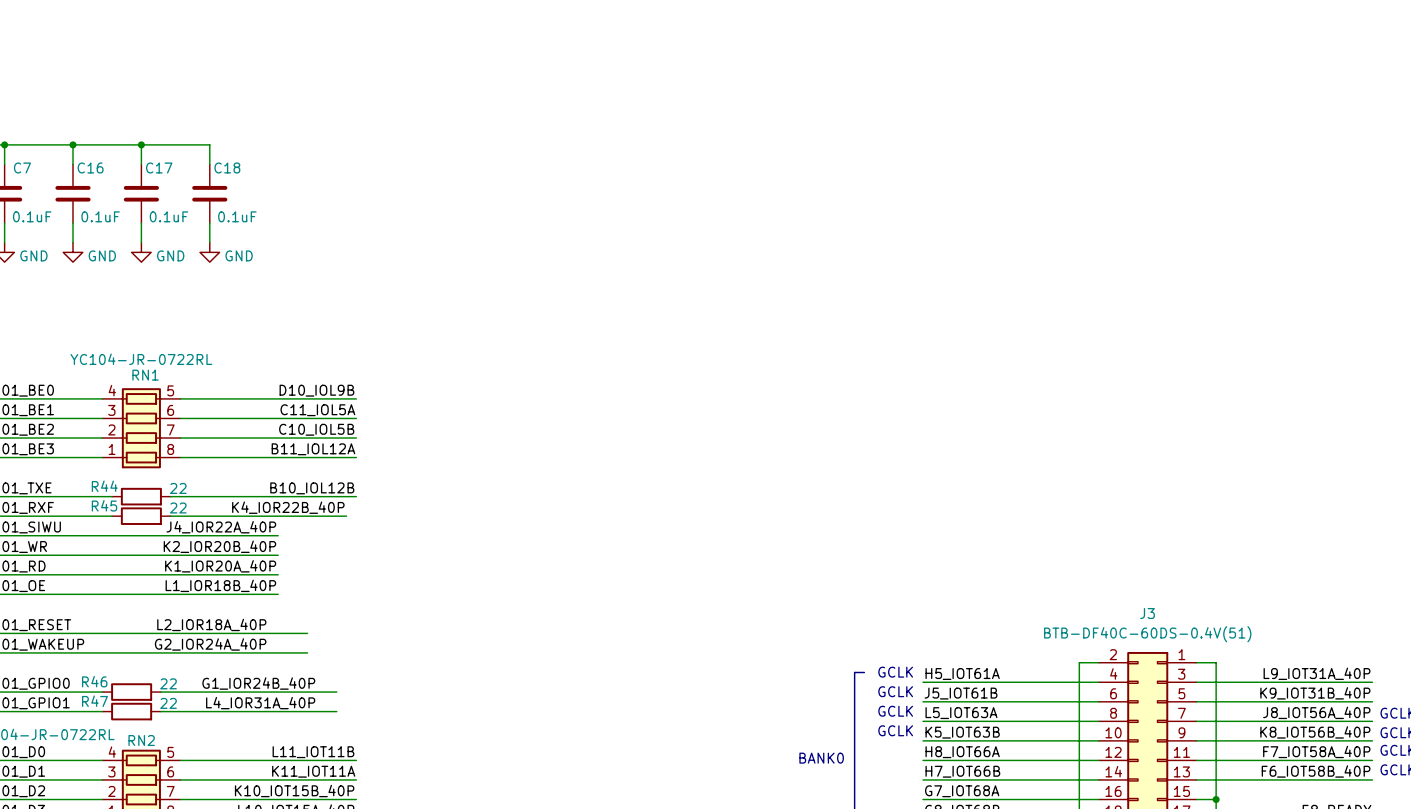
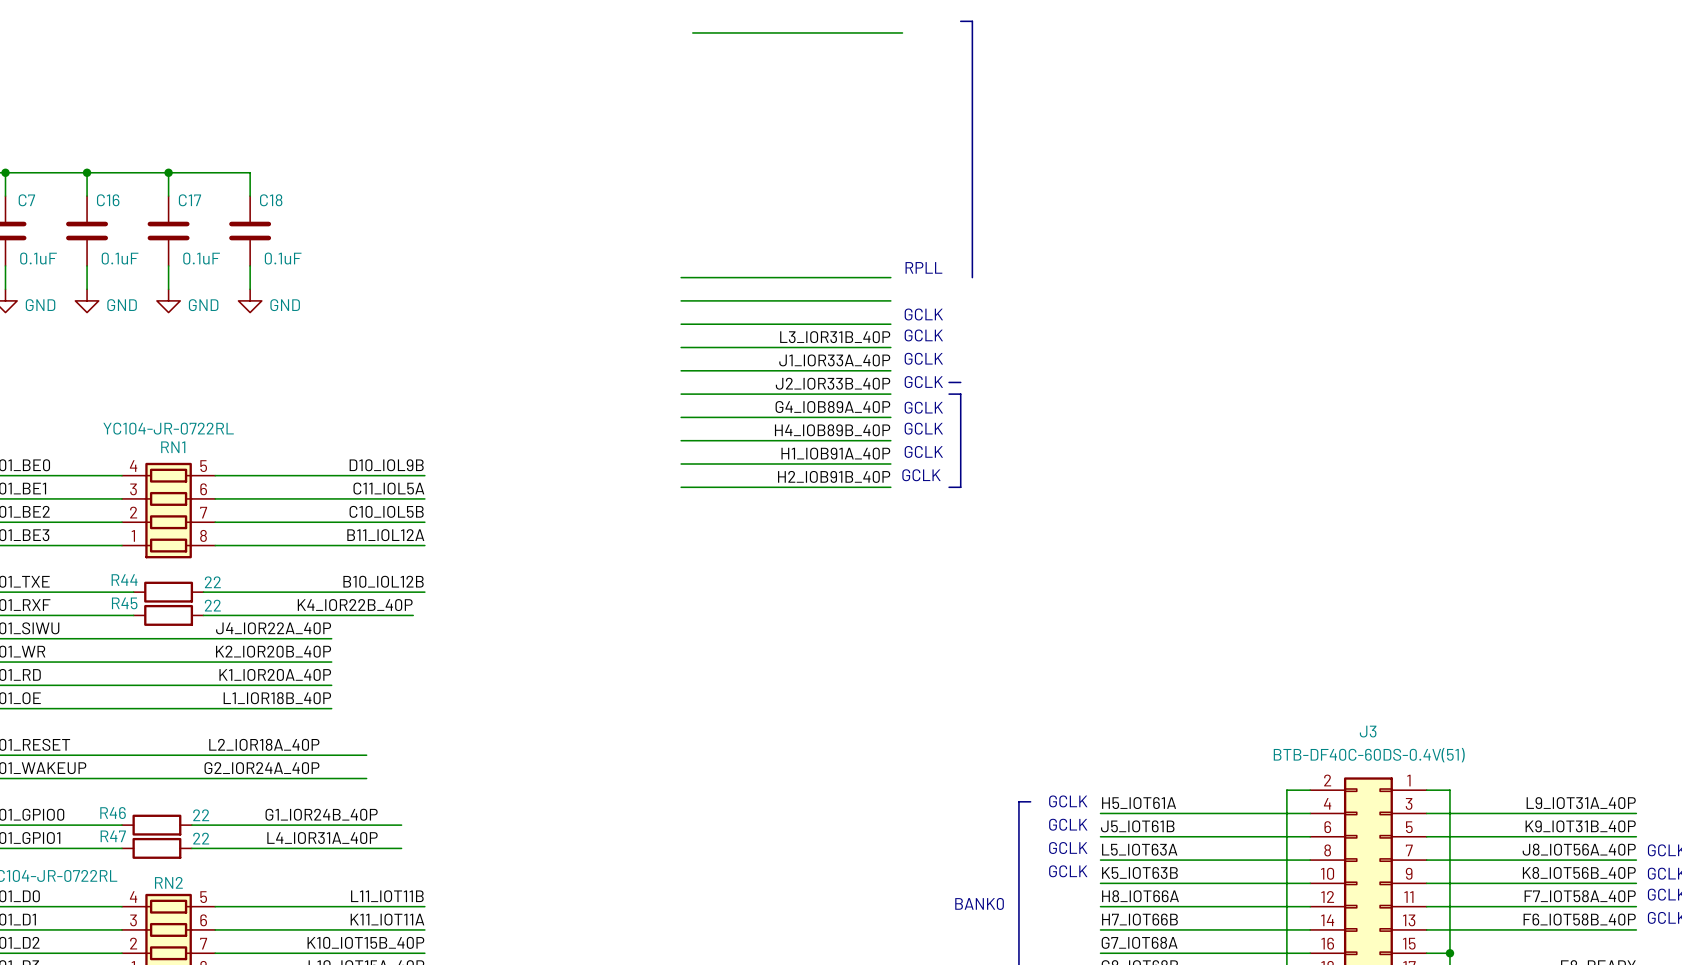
line: none -> (960, 21) (972, 21) (972, 277)
wire: none -> (692, 32) (902, 32)
text: none -> RPLL (923, 267)
wire: none -> (681, 277) (890, 277)
wire: none -> (681, 300) (890, 300)
text: none -> GCLK (923, 314)
wire: none -> (681, 324) (890, 324)
text: none -> GCLK (923, 335)
label: none -> L3_IOR31B_40P (835, 337)
wire: none -> (681, 347) (890, 347)
text: none -> GCLK (923, 358)
label: none -> J1_IOR33A_40P (834, 360)
wire: none -> (681, 370) (890, 370)
text: none -> GCLK (923, 382)
line: none -> (949, 382) (960, 382)
label: none -> J2_IOR33B_40P (833, 383)
wire: none -> (681, 394) (890, 394)
line: none -> (949, 394) (960, 394) (960, 487) (949, 487)
label: none -> G4_IOB89A_40P (832, 407)
text: none -> GCLK (923, 407)
wire: none -> (681, 417) (890, 417)
text: none -> GCLK (923, 428)
label: none -> H4_IOB89B_40P (832, 430)
wire: none -> (681, 440) (890, 440)
text: none -> GCLK (923, 451)
label: none -> H1_IOB91A_40P (835, 453)
wire: none -> (681, 463) (890, 463)
text: none -> GCLK (921, 475)
label: none -> H2_IOB91B_40P (834, 476)
wire: none -> (681, 487) (890, 487)

